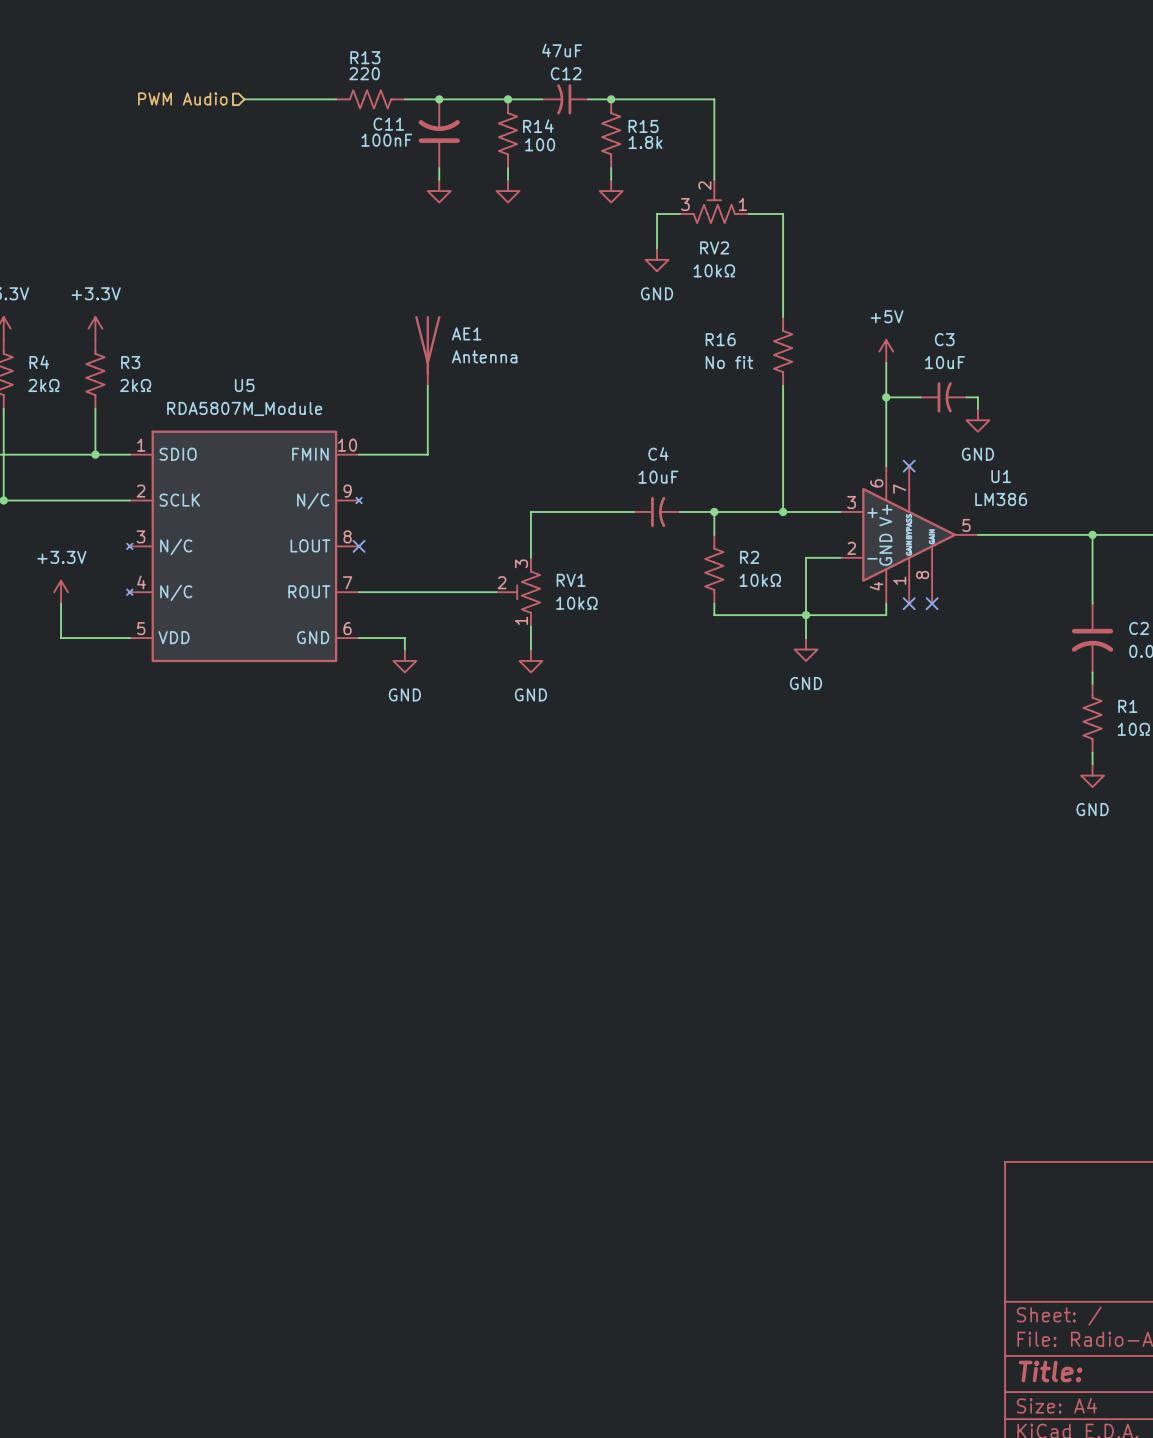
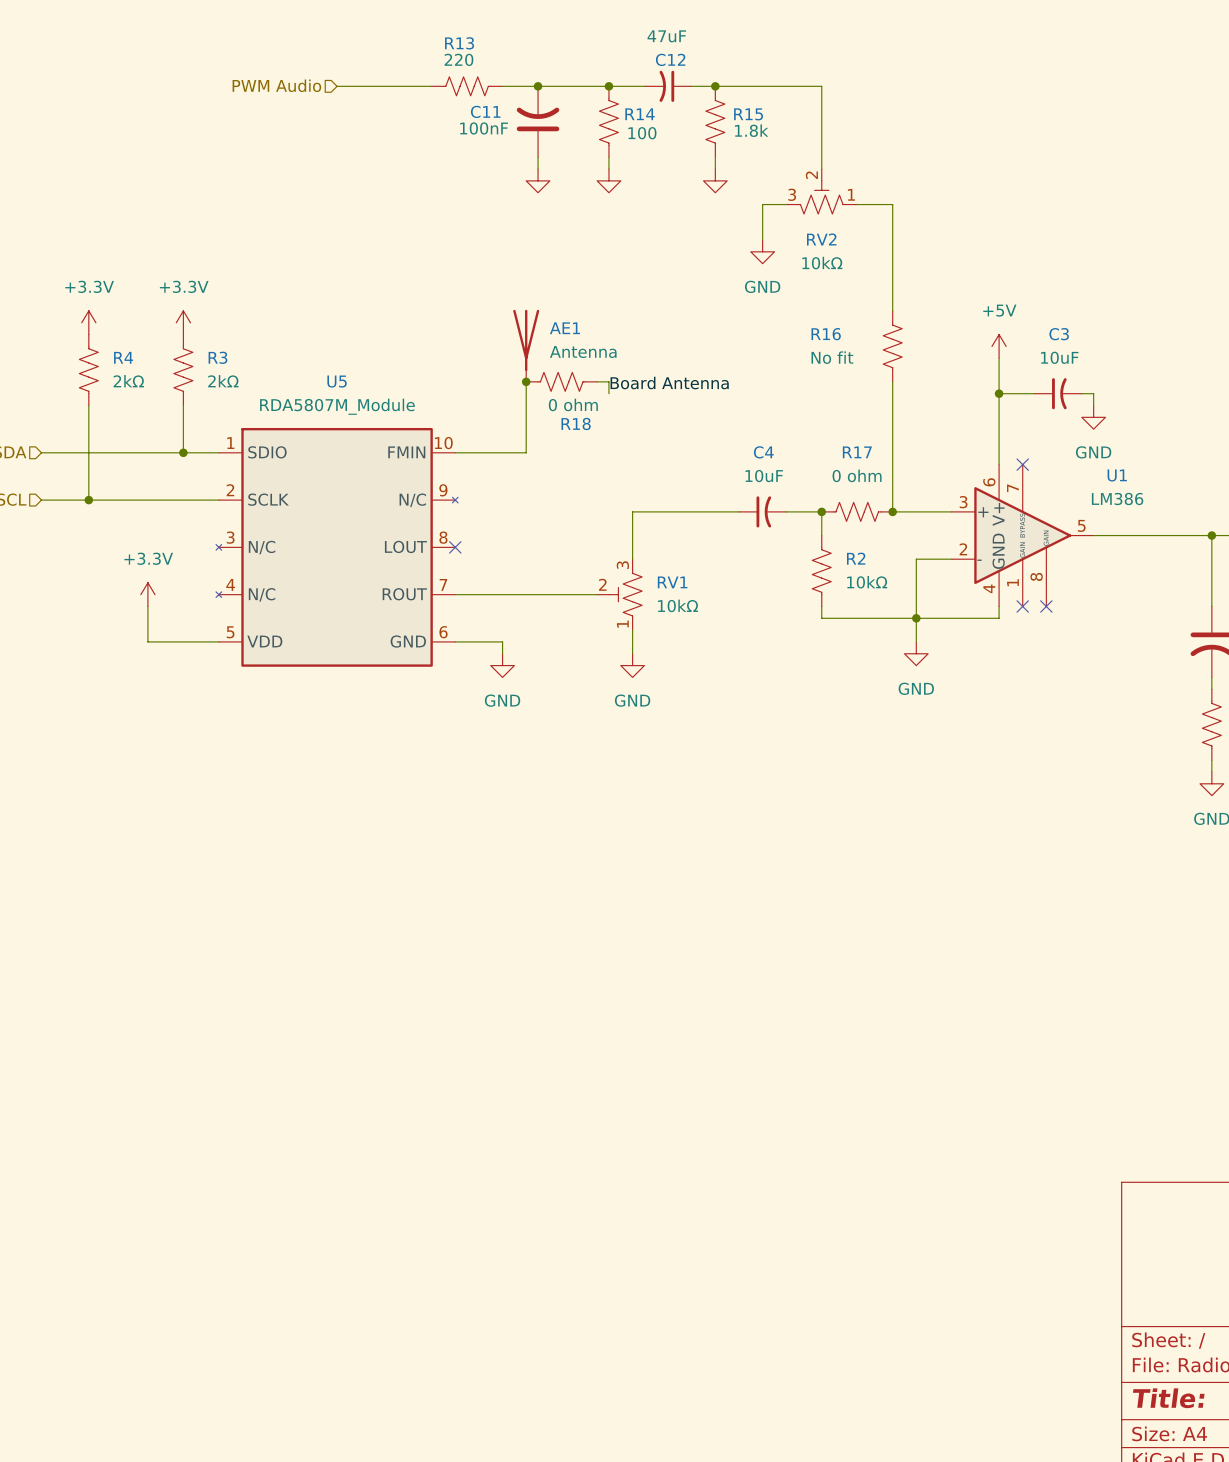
junction: none -> (526, 381)
R18: none -> 0 ohm (561, 381)
wire: none -> (597, 381) (608, 381) (608, 393)
label: none -> Board Antenna (669, 383)
R17: none -> 0 ohm (857, 511)

